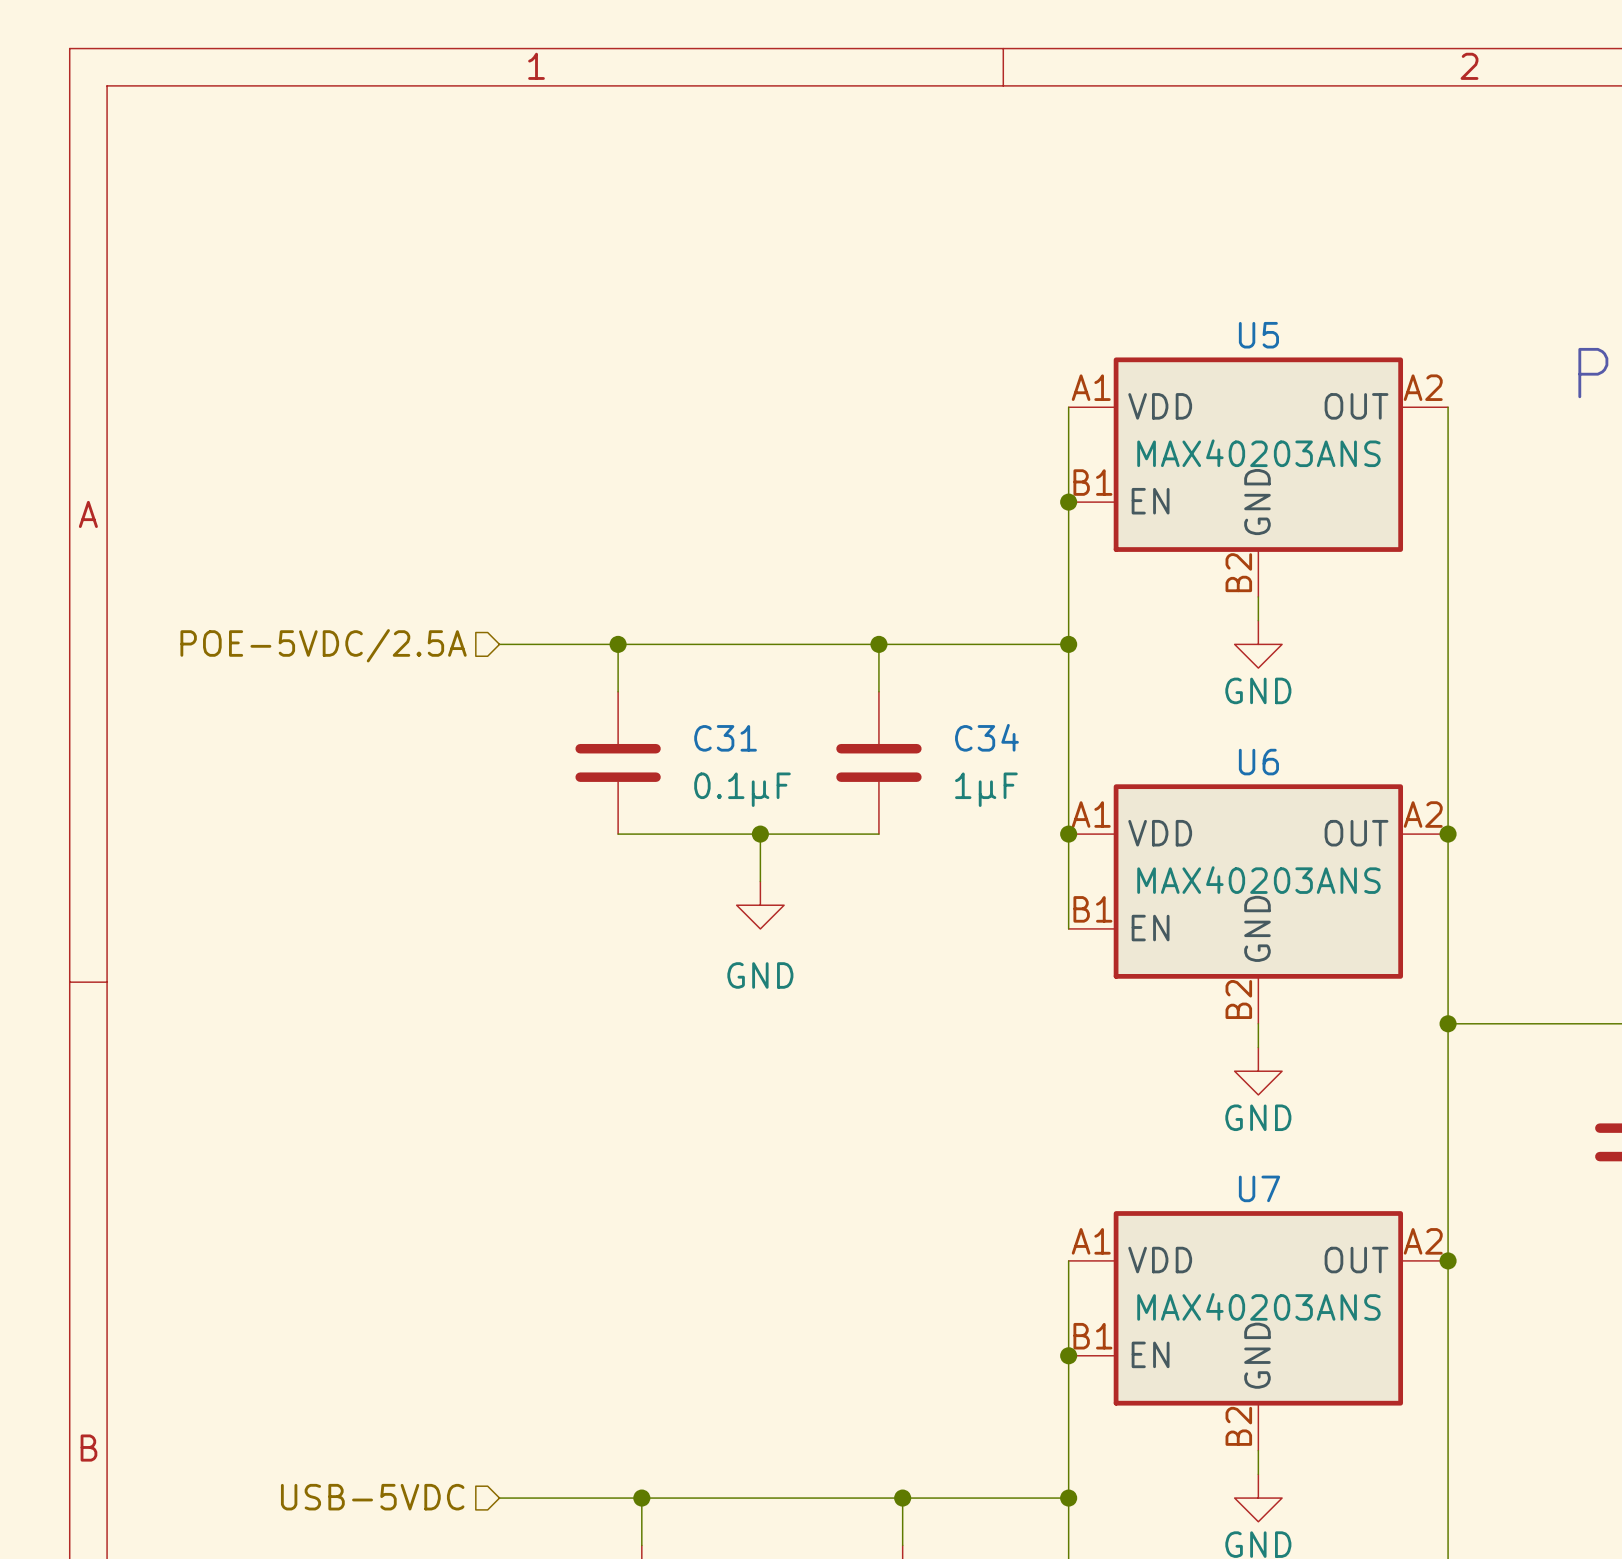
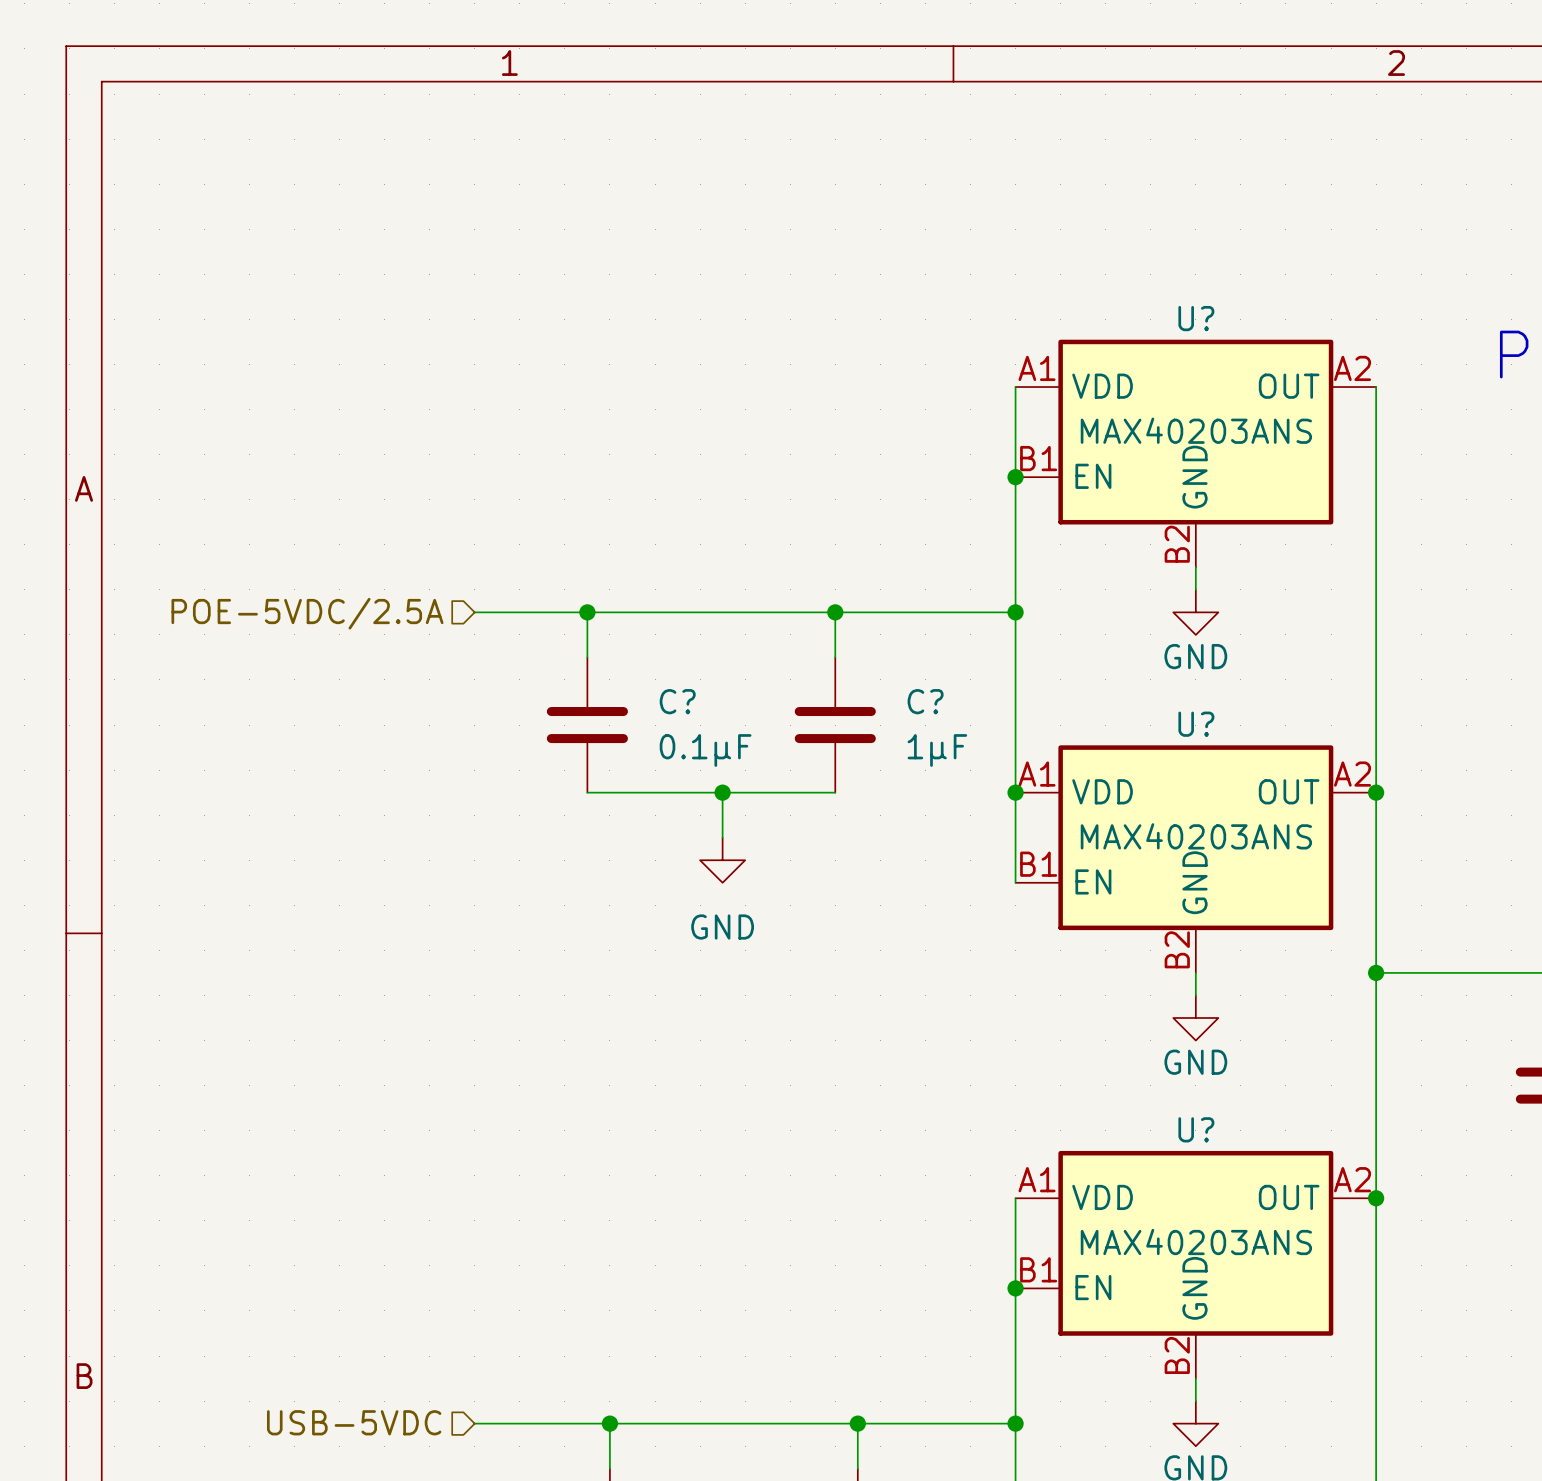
U5 name: U5 (1258, 335) -> U? (1196, 318)
C34 name: C34 (986, 737) -> C? (925, 701)
C31 name: C31 (725, 738) -> C? (677, 701)
U6 name: U6 (1258, 762) -> U? (1196, 724)
U7 name: U7 (1259, 1188) -> U? (1196, 1129)

